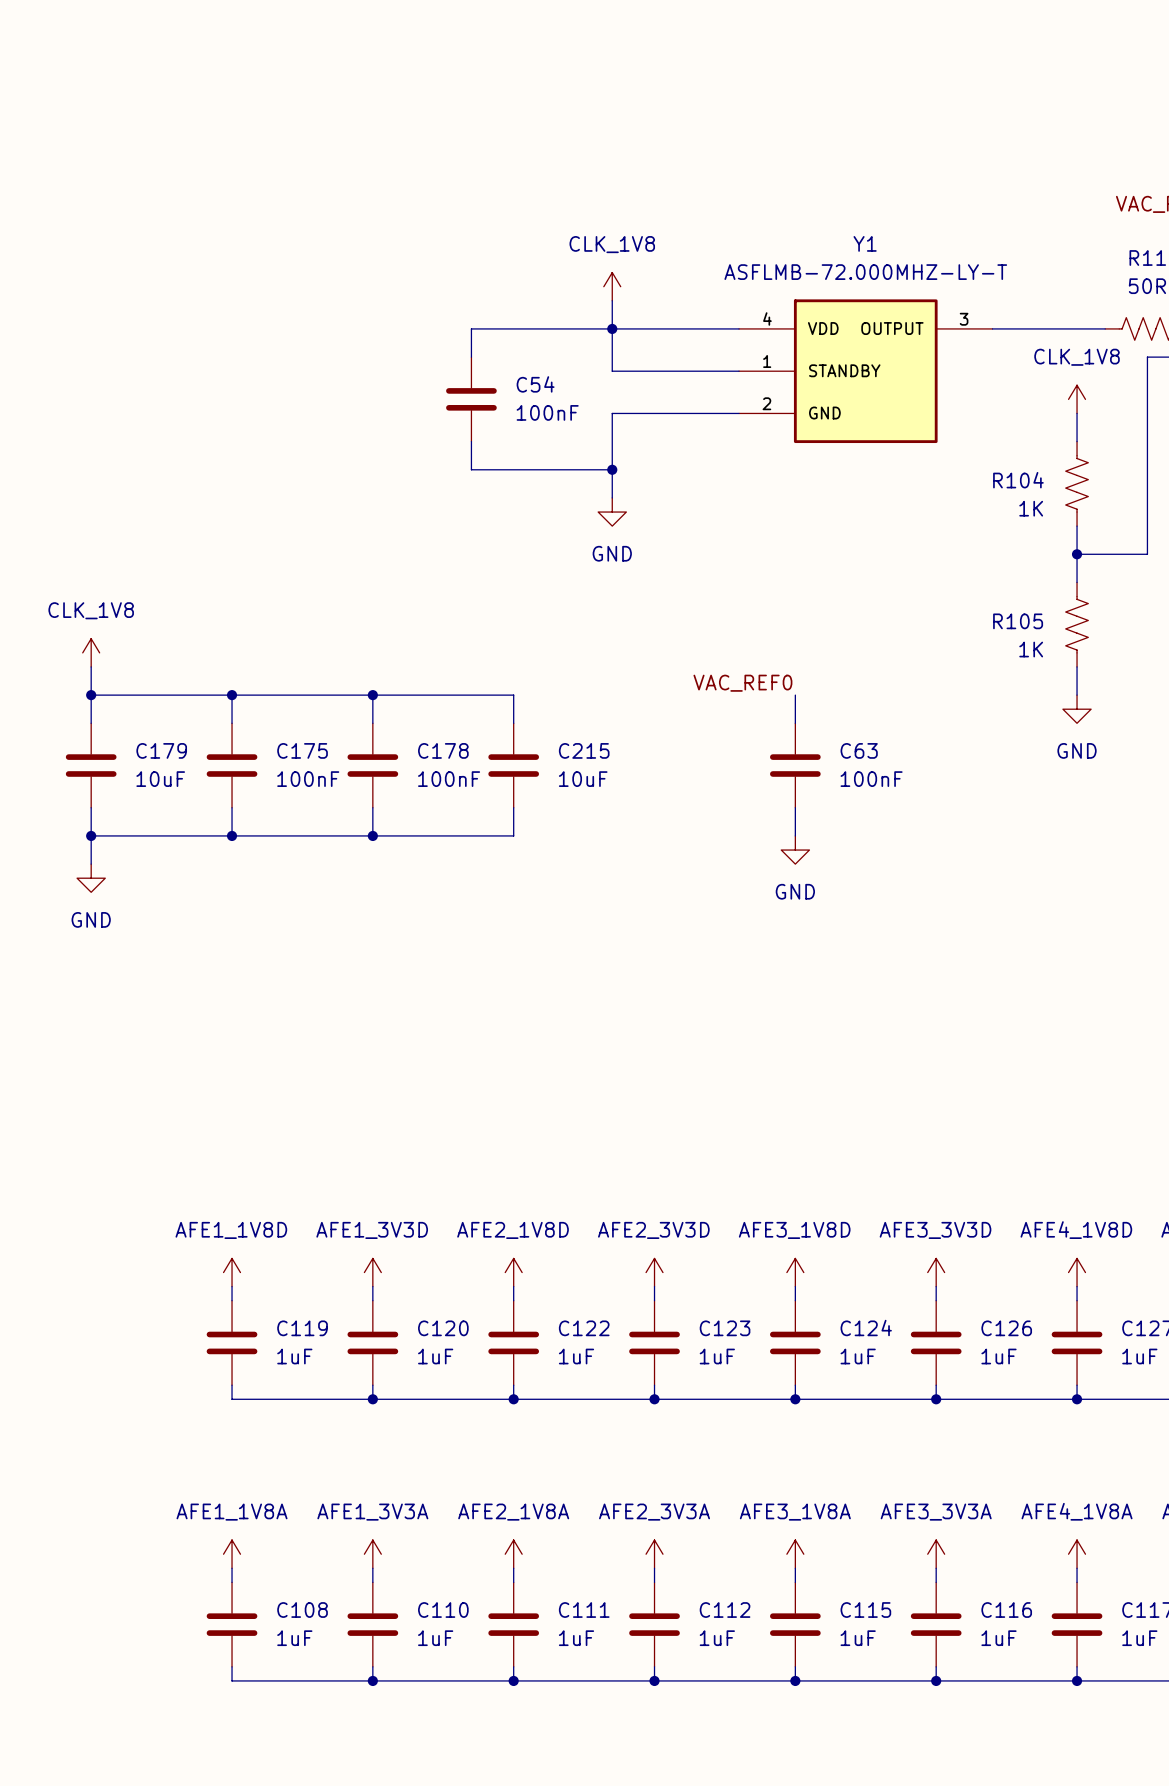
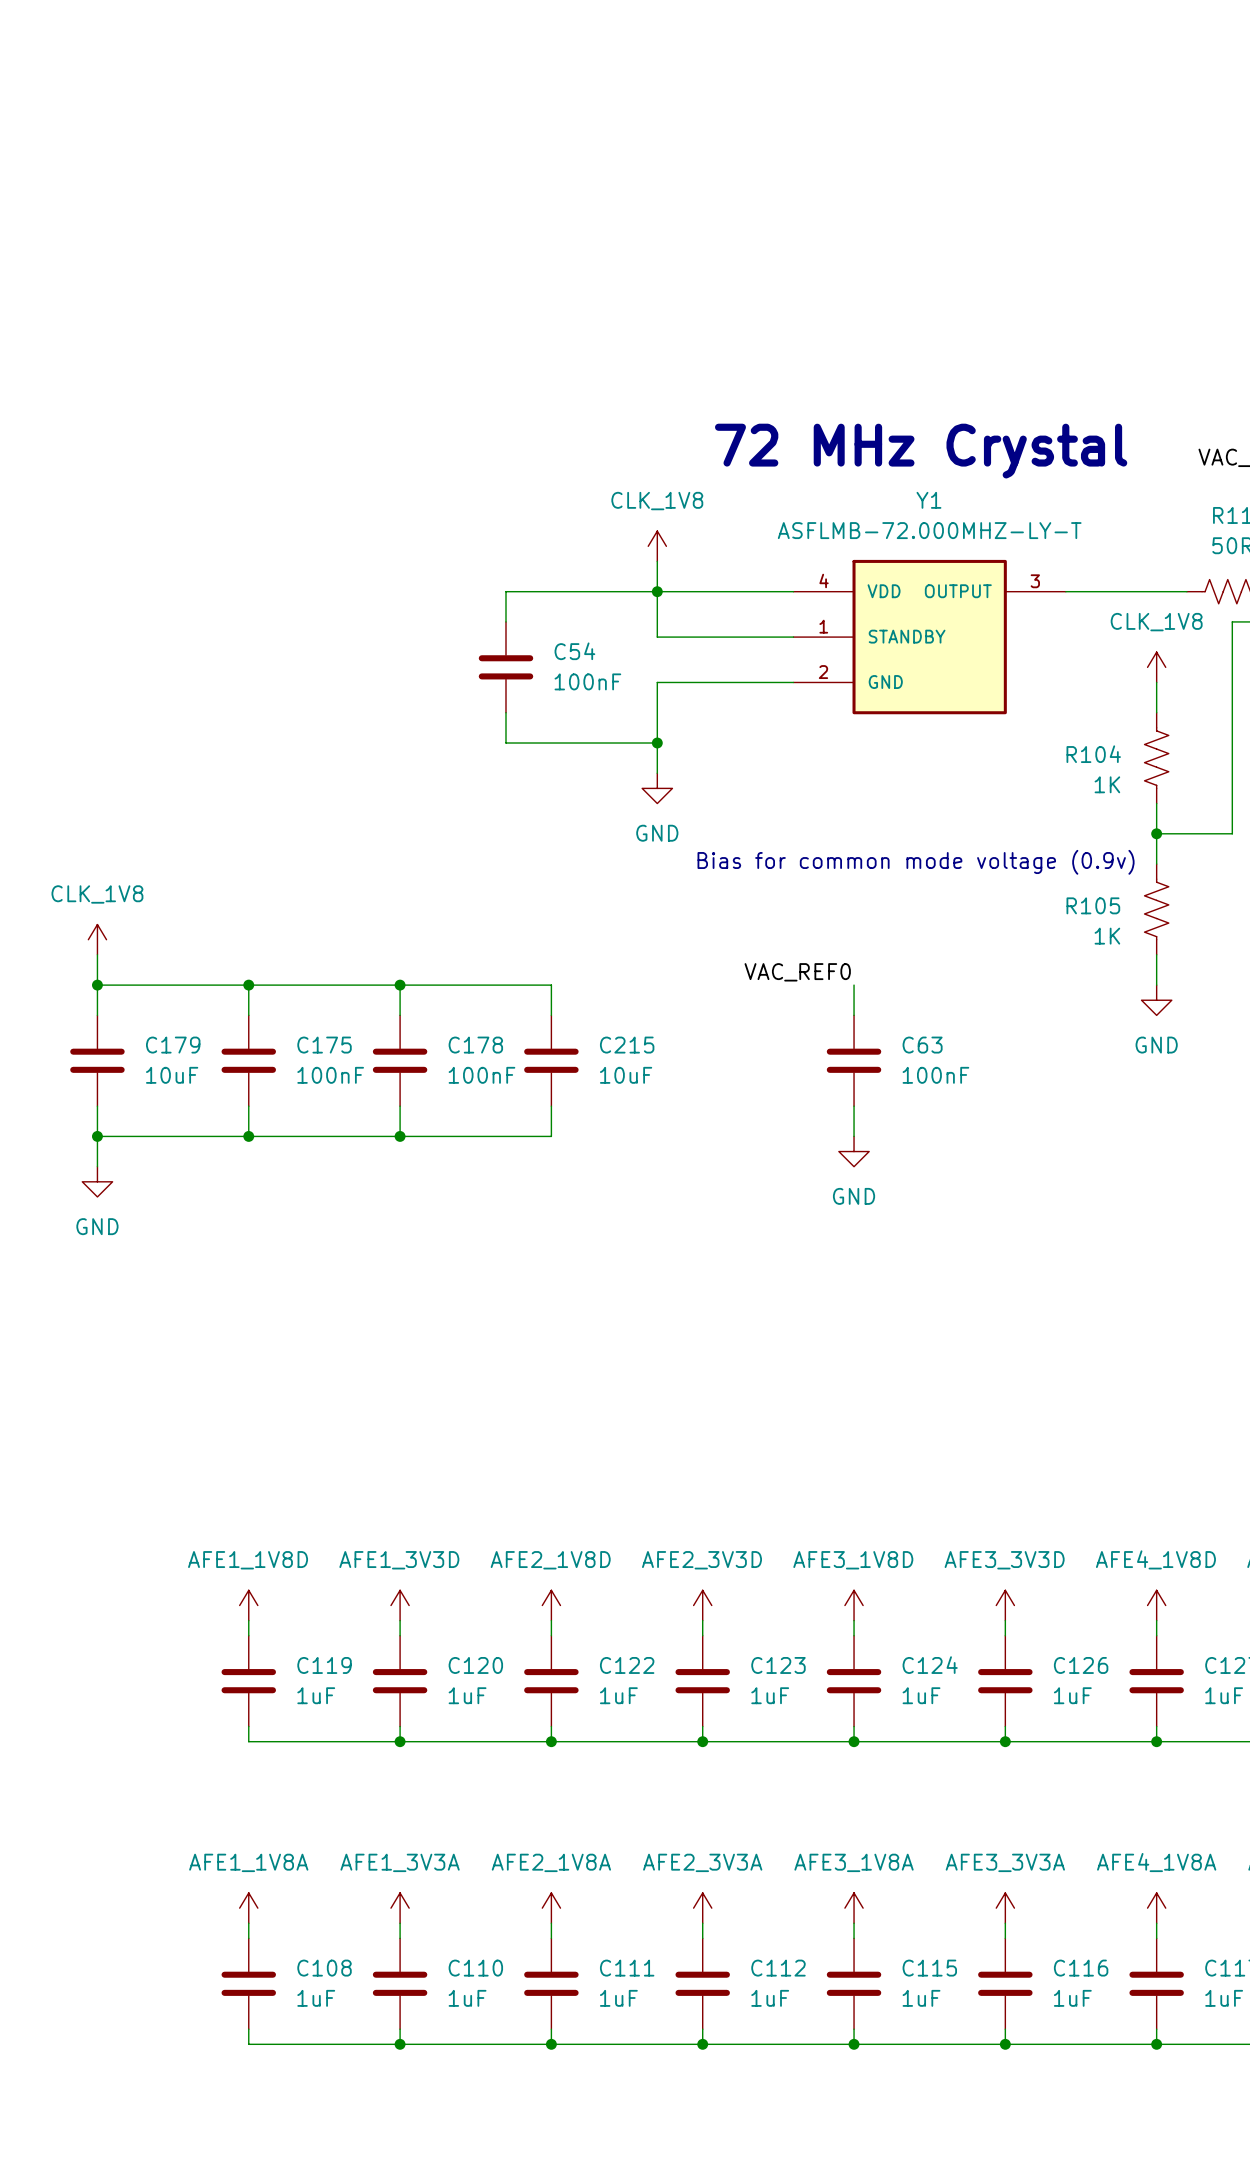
text: none -> 72 MHz Crystal (921, 451)
text: none -> Bias for common mode voltage (0.9v) (916, 862)

